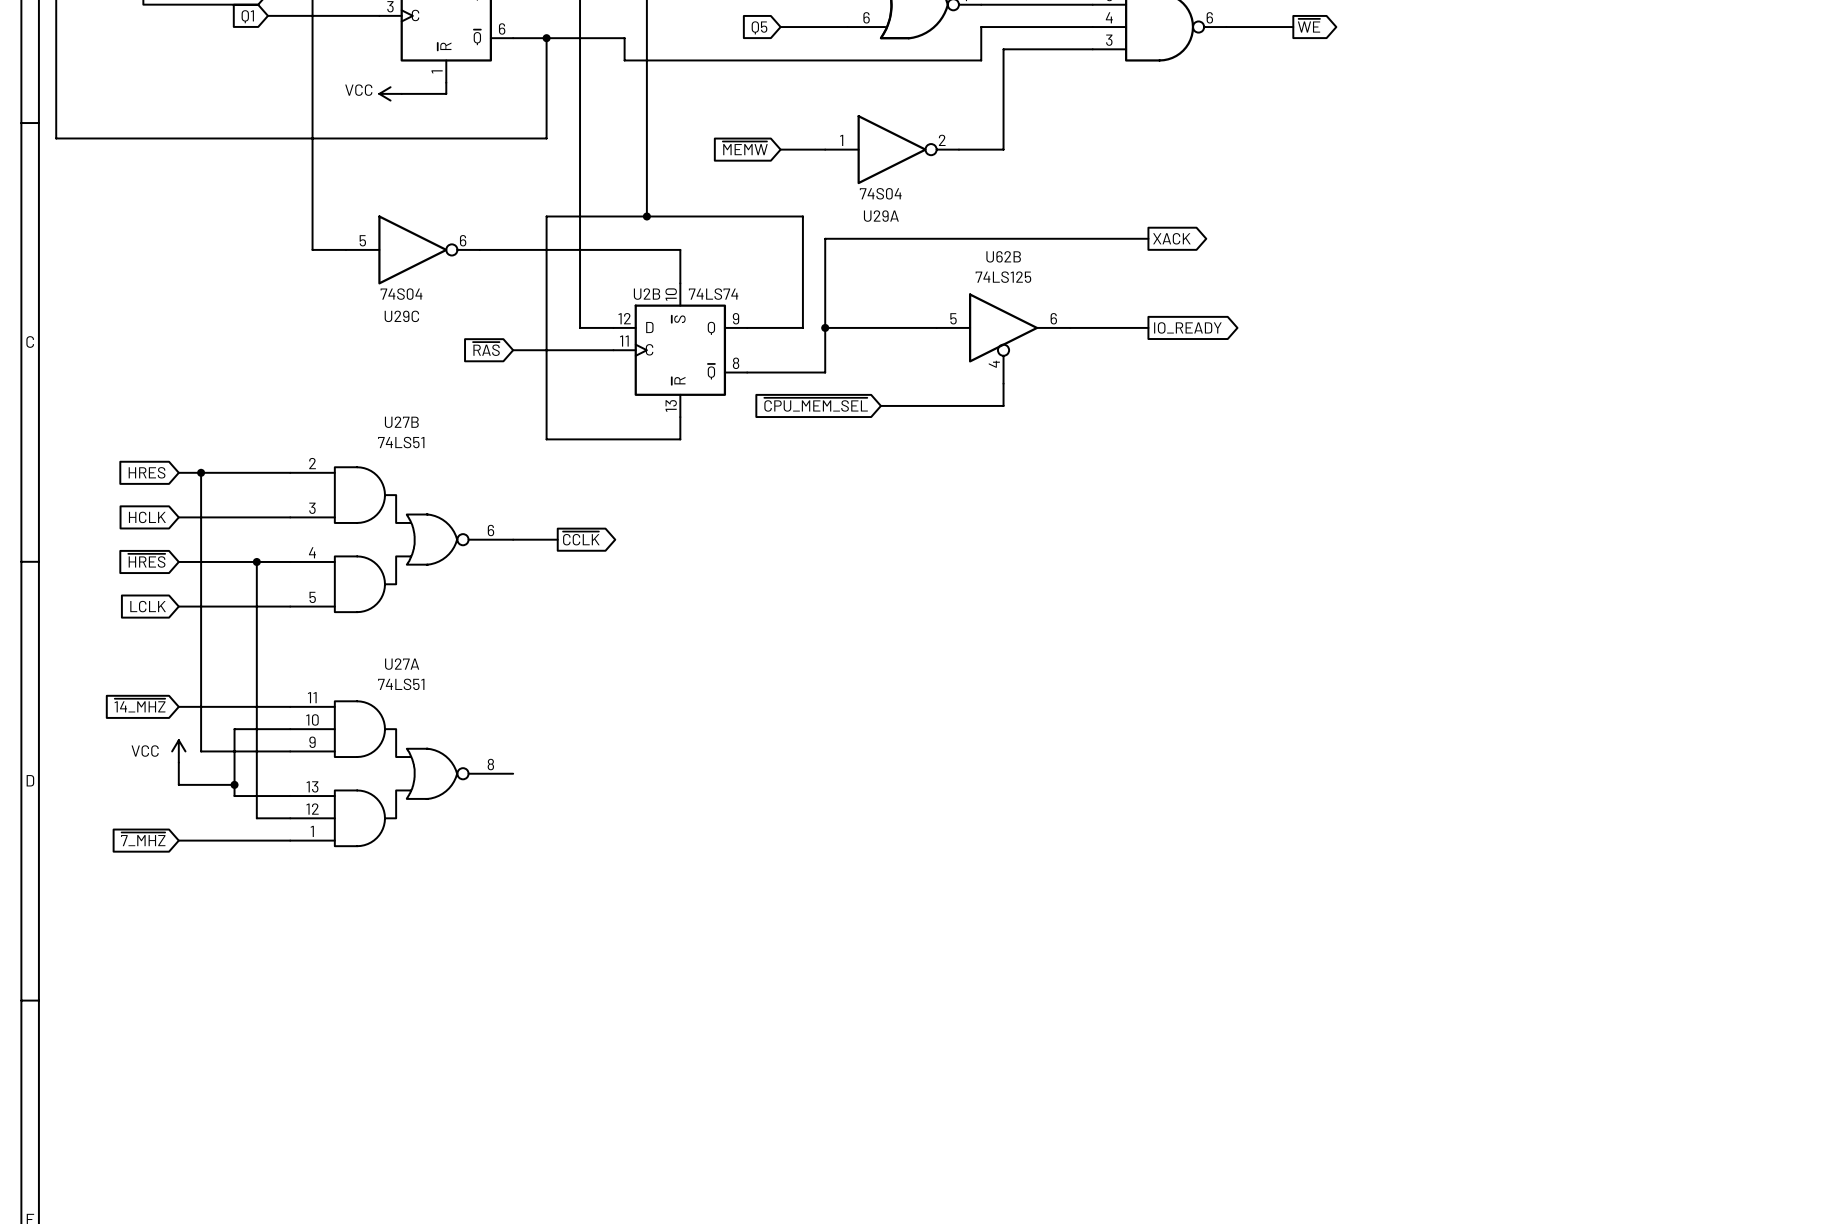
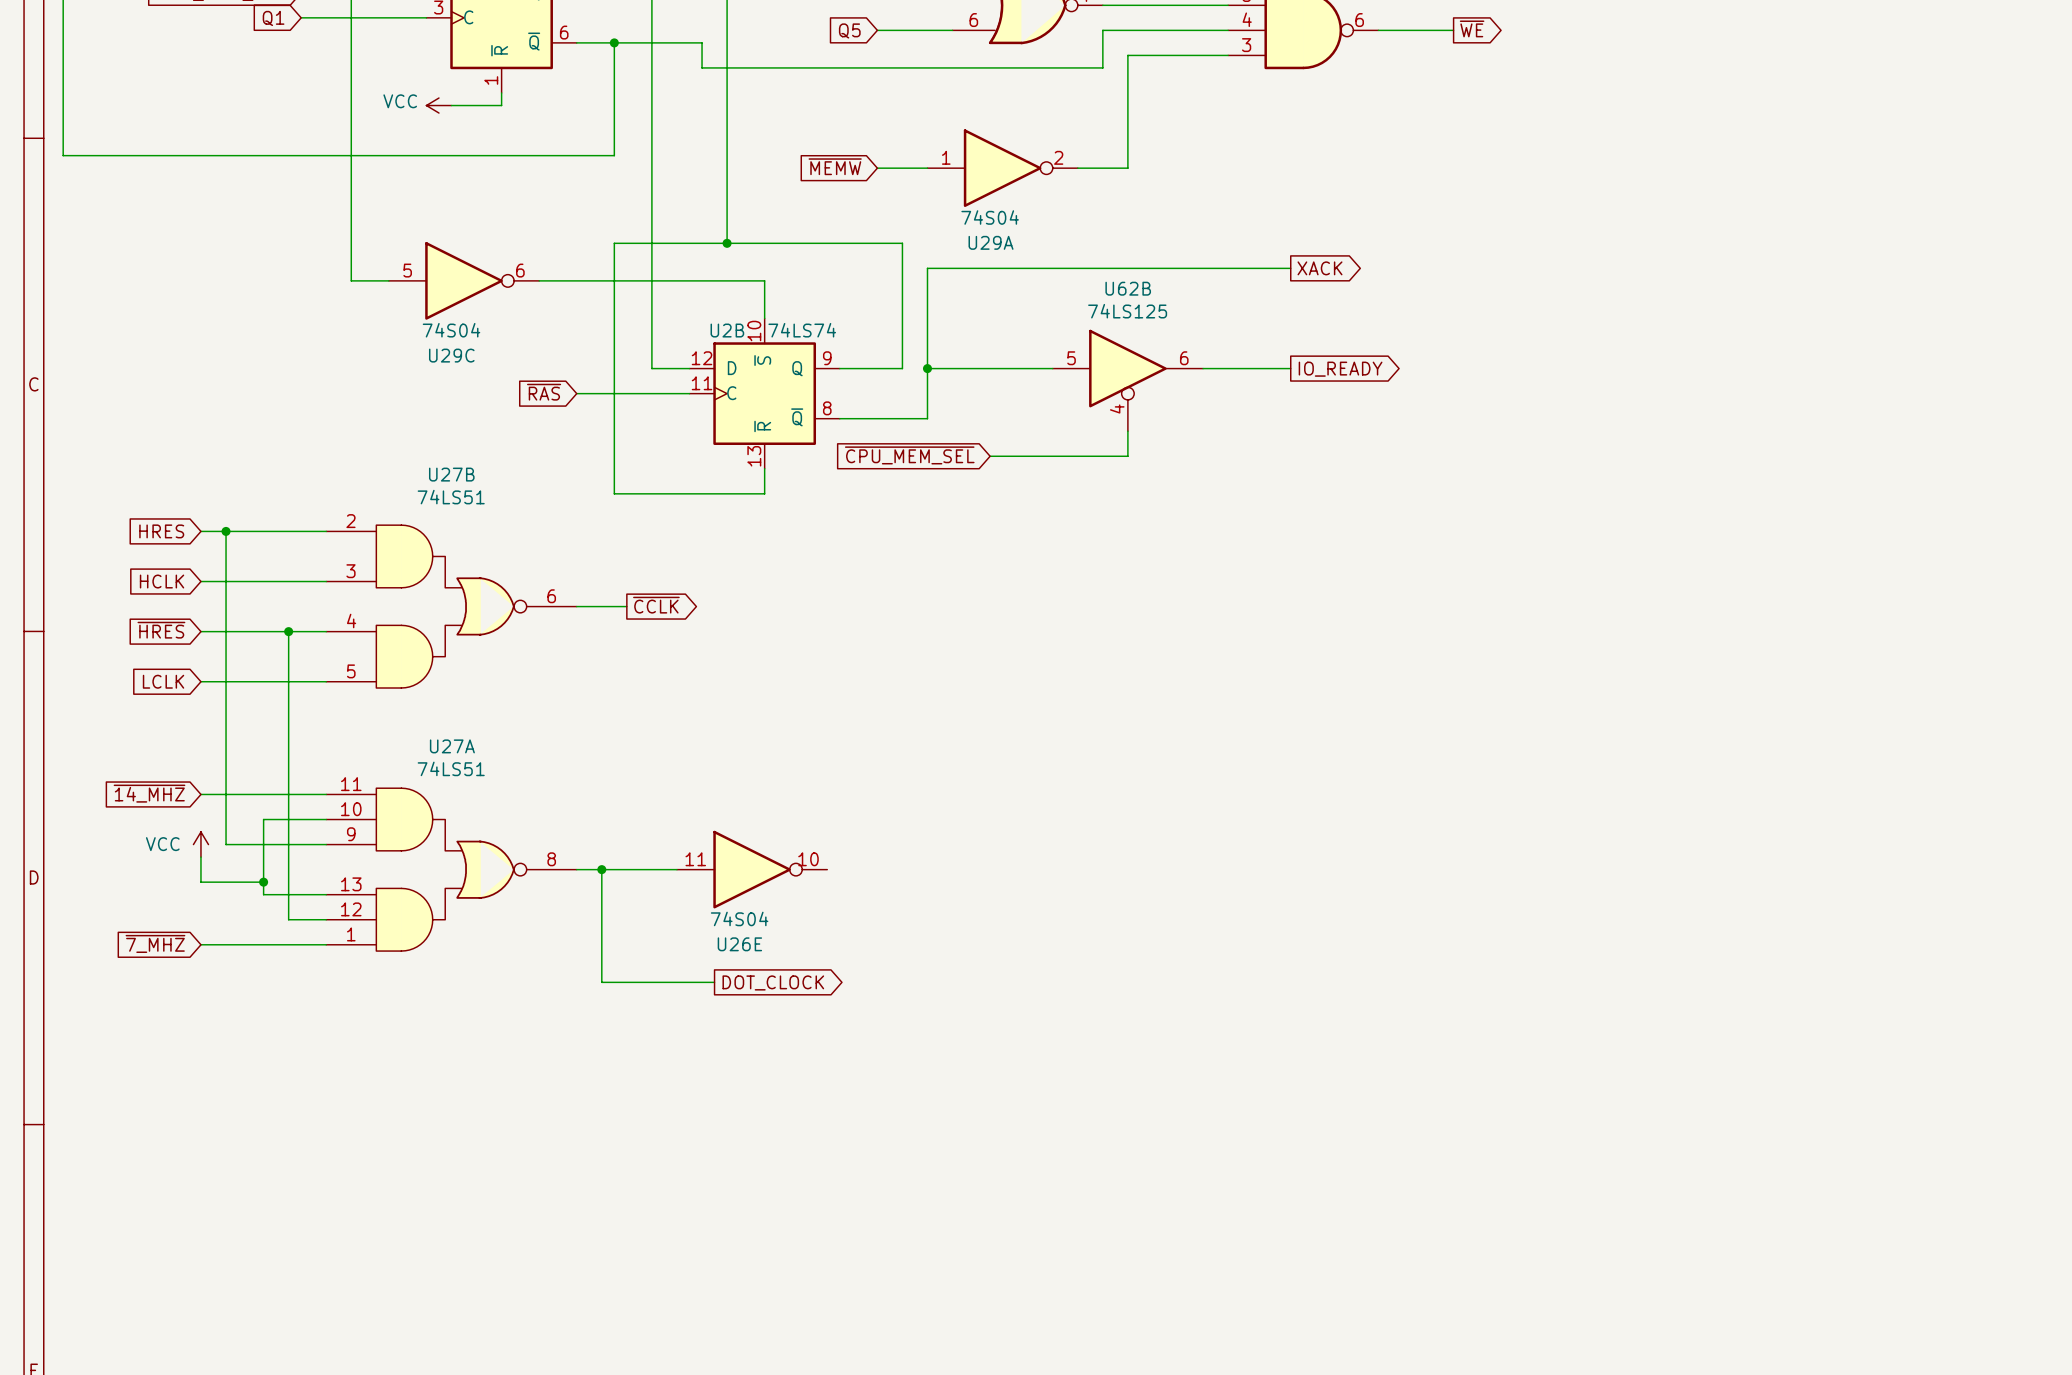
wire: none -> (576, 869) (676, 869)
wire: none -> (601, 869) (601, 982) (714, 982)
junction: none -> (601, 869)
U26E: none -> 74S04 (752, 869)
global label: none -> DOT_CLOCK (773, 982)

